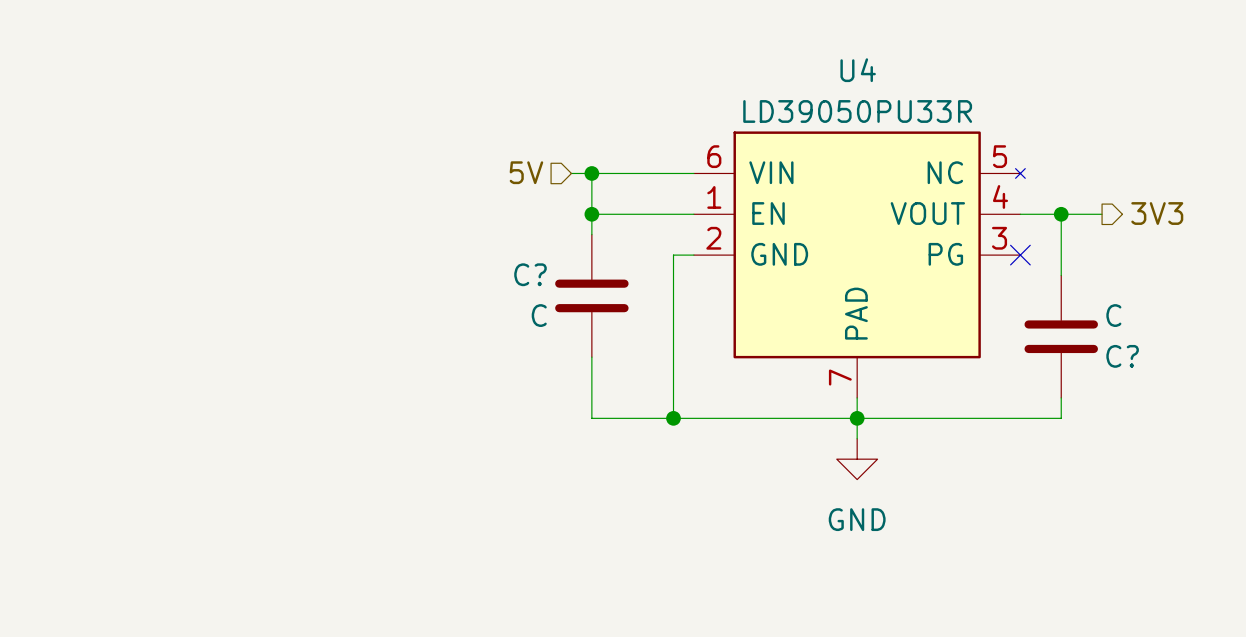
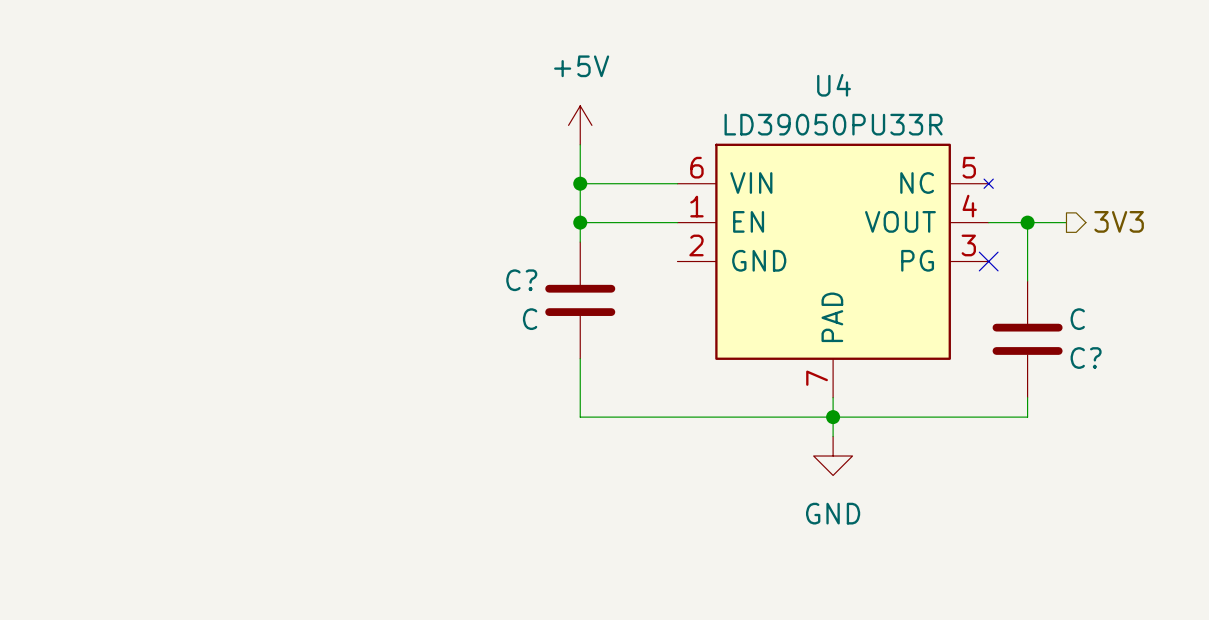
power symbol: none -> +5V (580, 125)
hierarchical label: 5V (526, 172) -> none
wire: (571, 173) (591, 173) -> (580, 144) (580, 183)
wire: (693, 255) (673, 255) (673, 418) -> none
junction: (673, 418) -> none

